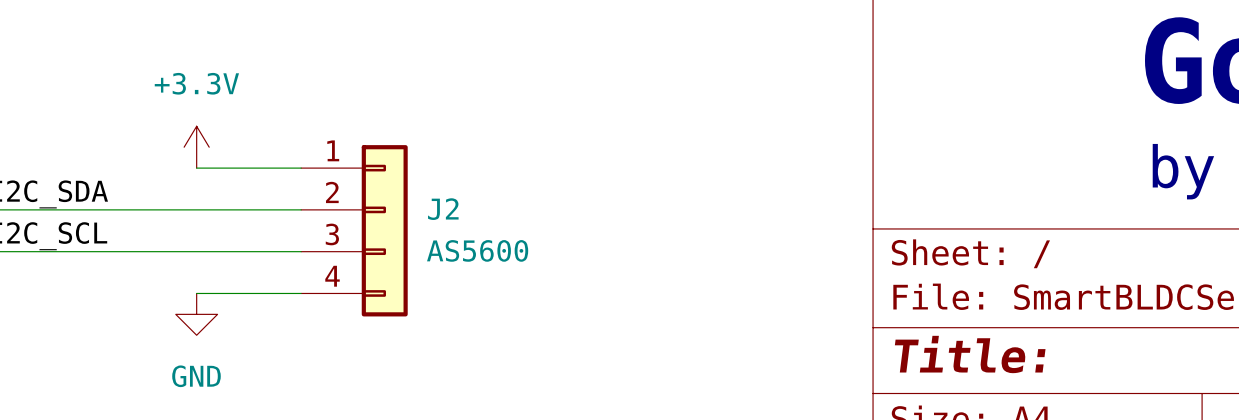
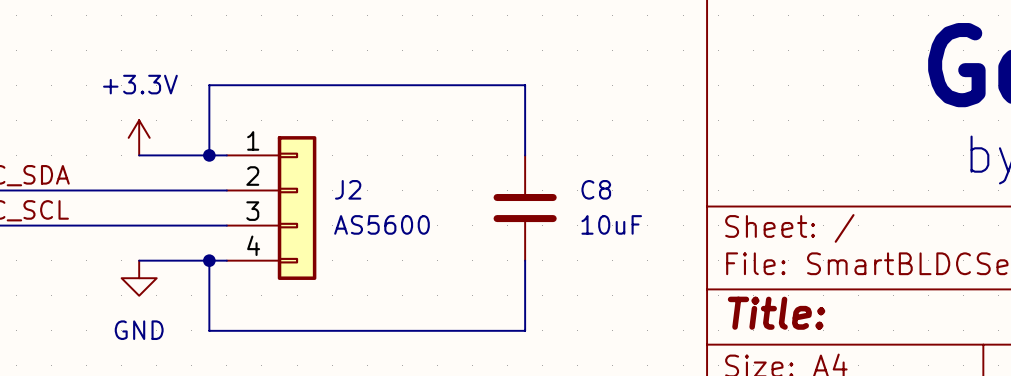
wire: none -> (209, 155) (209, 85) (525, 85) (525, 155)
junction: none -> (209, 155)
C8: none -> 10uF (525, 208)
wire: none -> (209, 260) (209, 330) (525, 330) (525, 260)
junction: none -> (209, 260)

